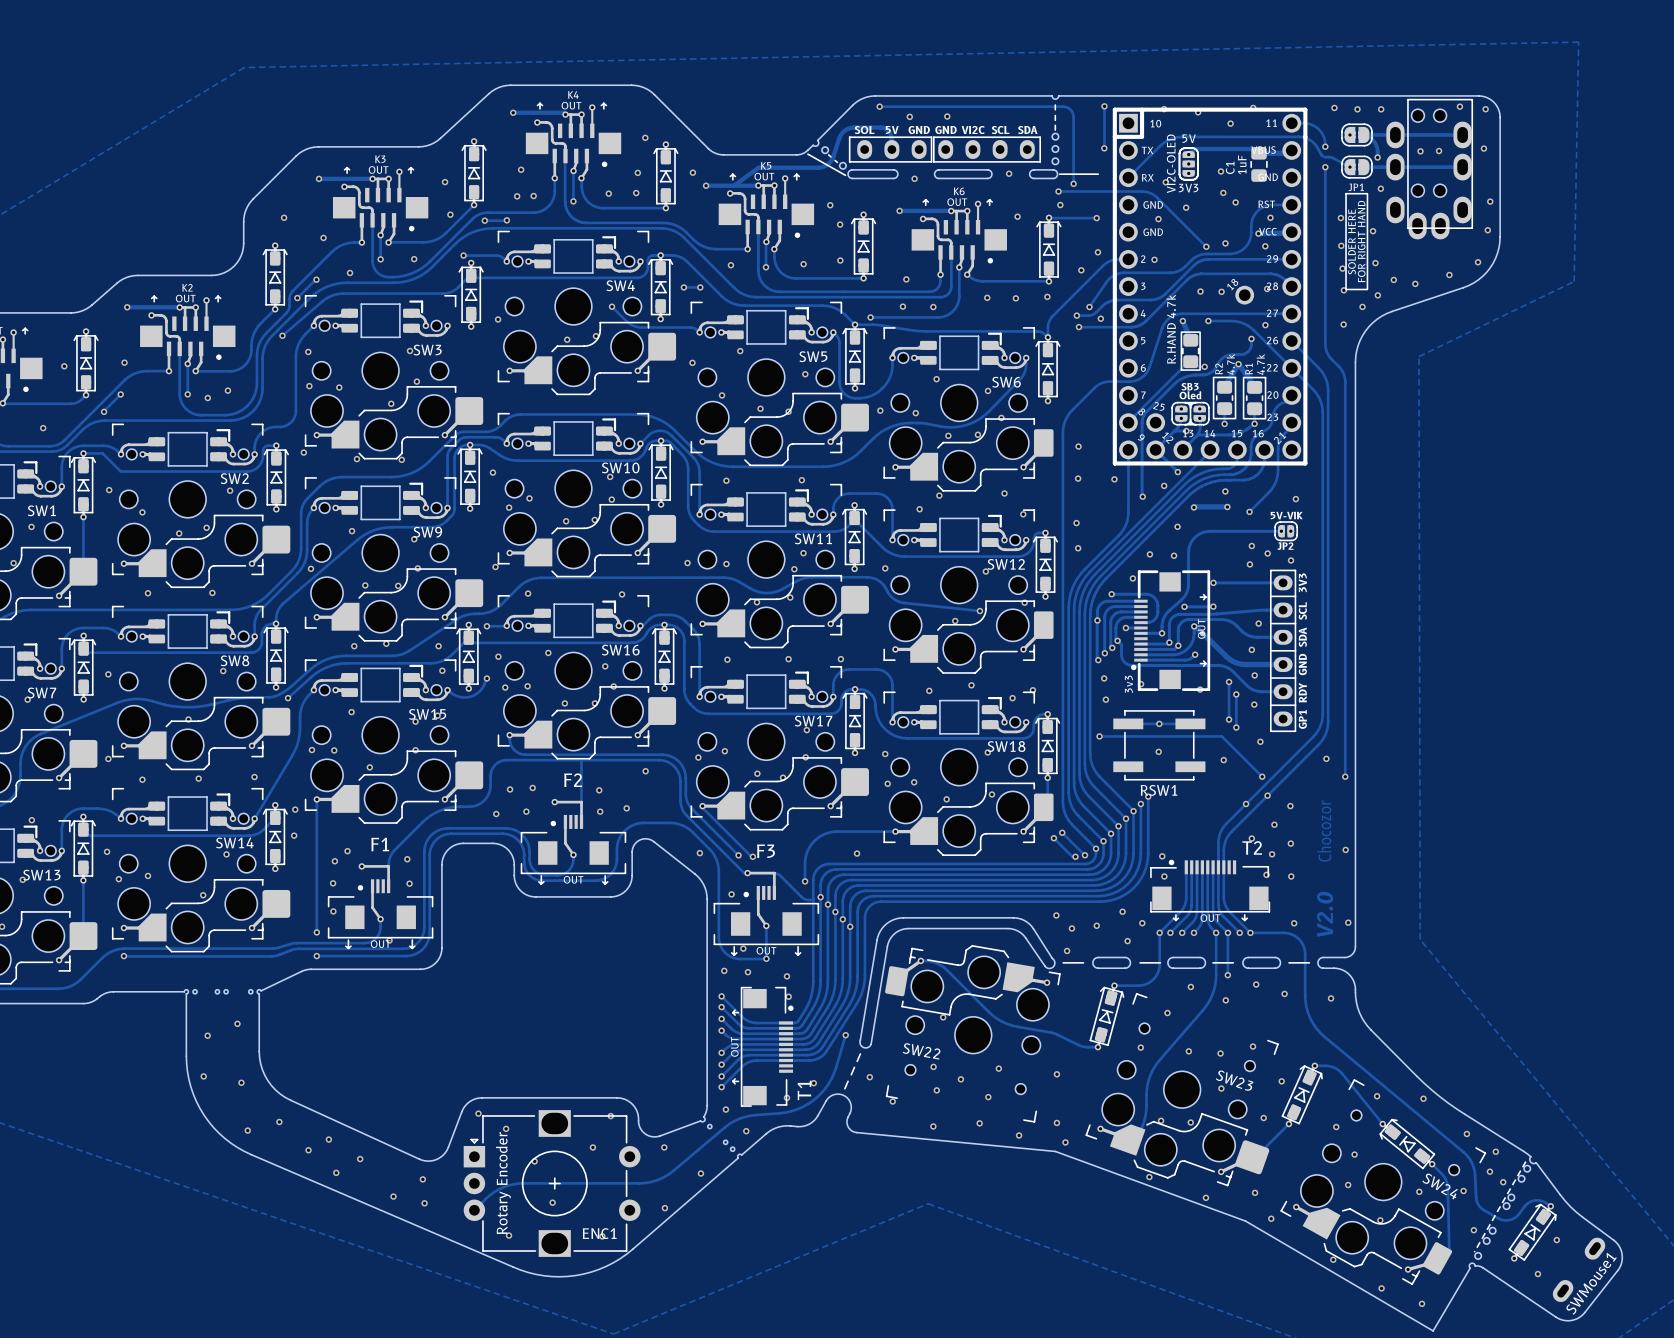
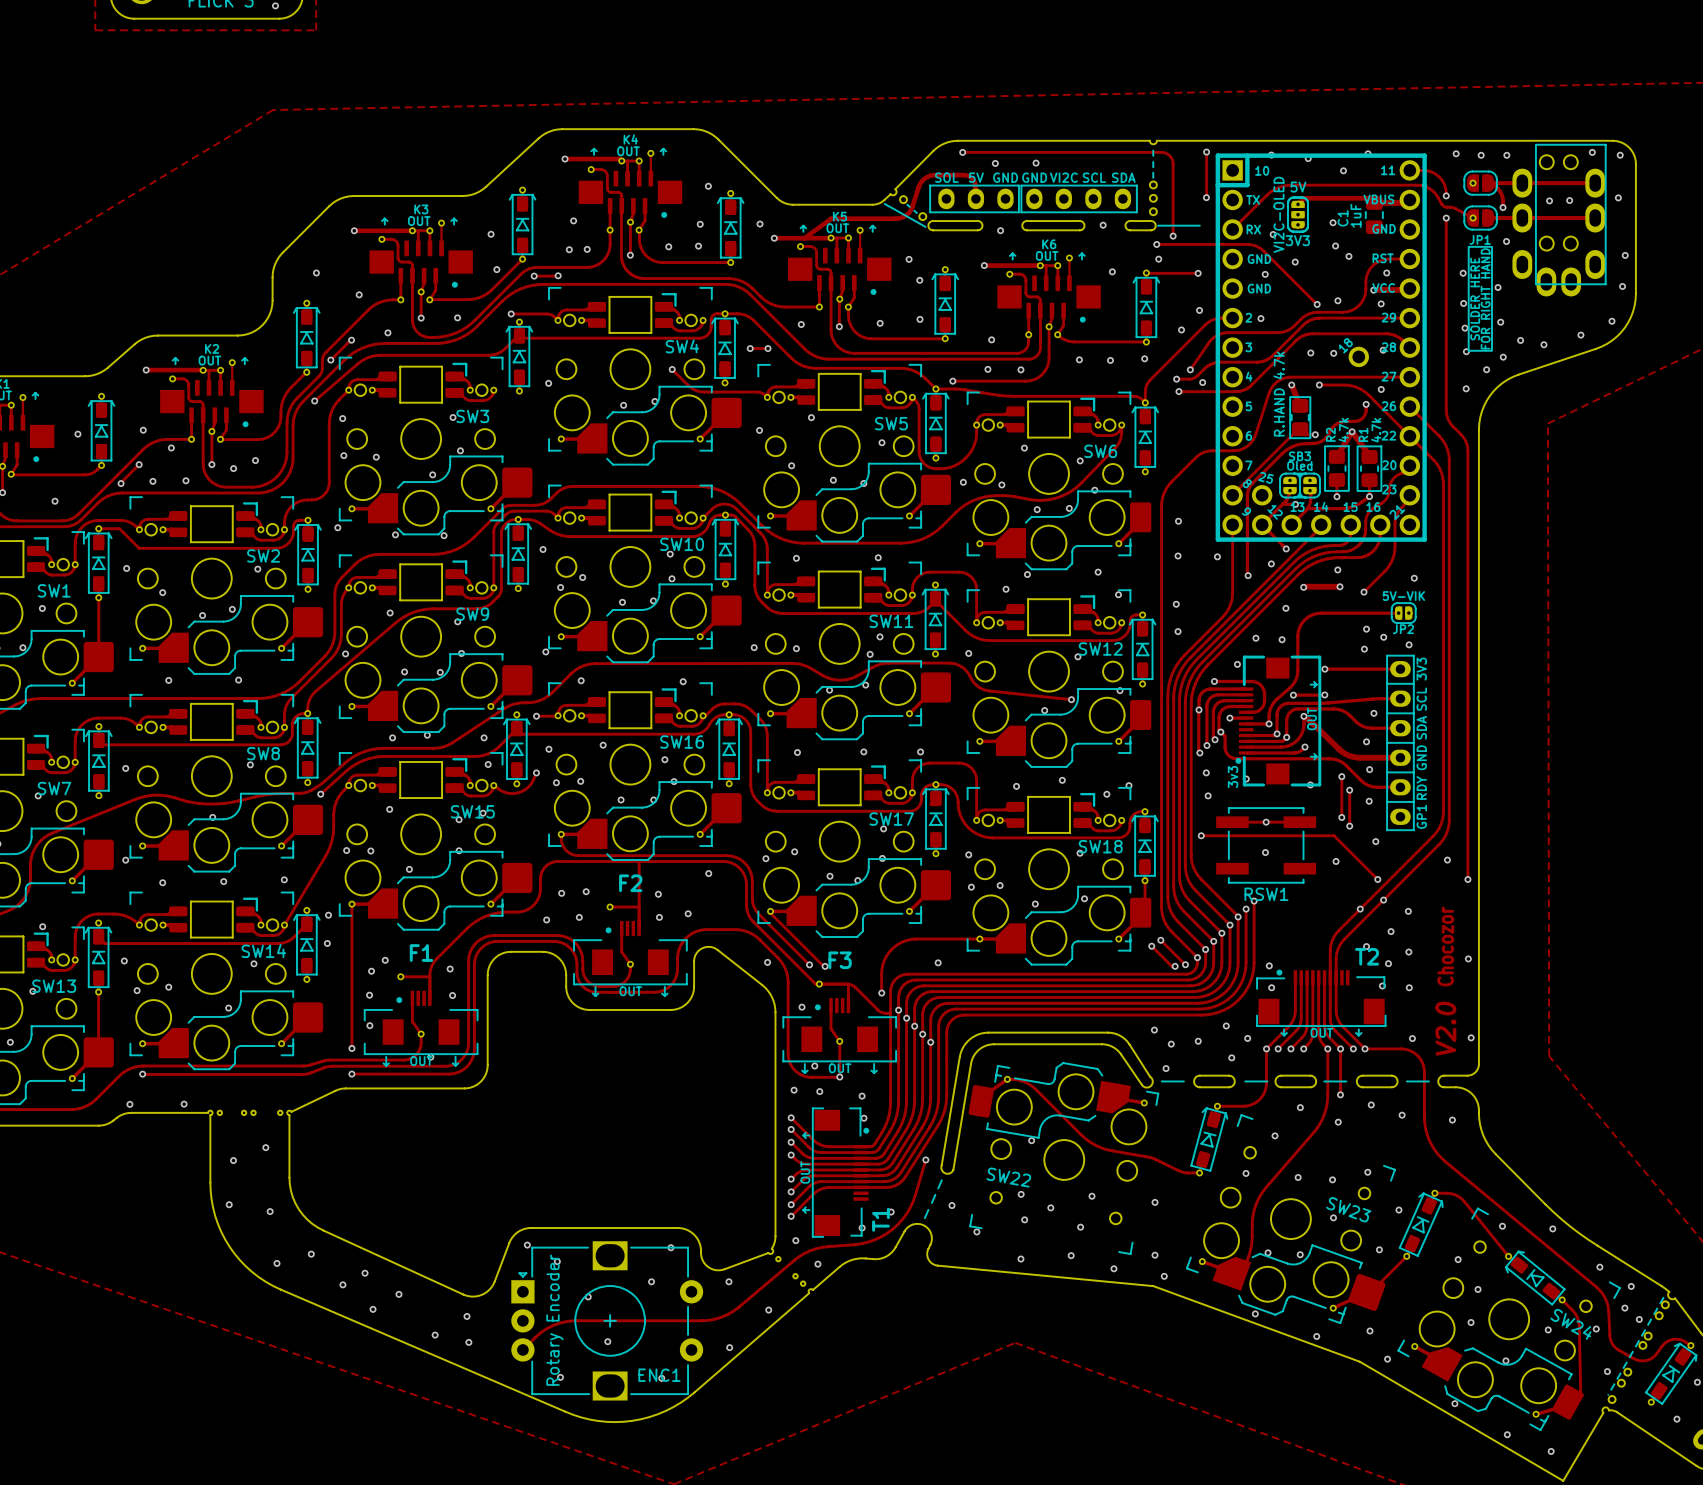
via: none -> (171, 447)
via: none -> (152, 481)
via: none -> (185, 480)
via: none -> (129, 1104)
via: none -> (184, 1104)

